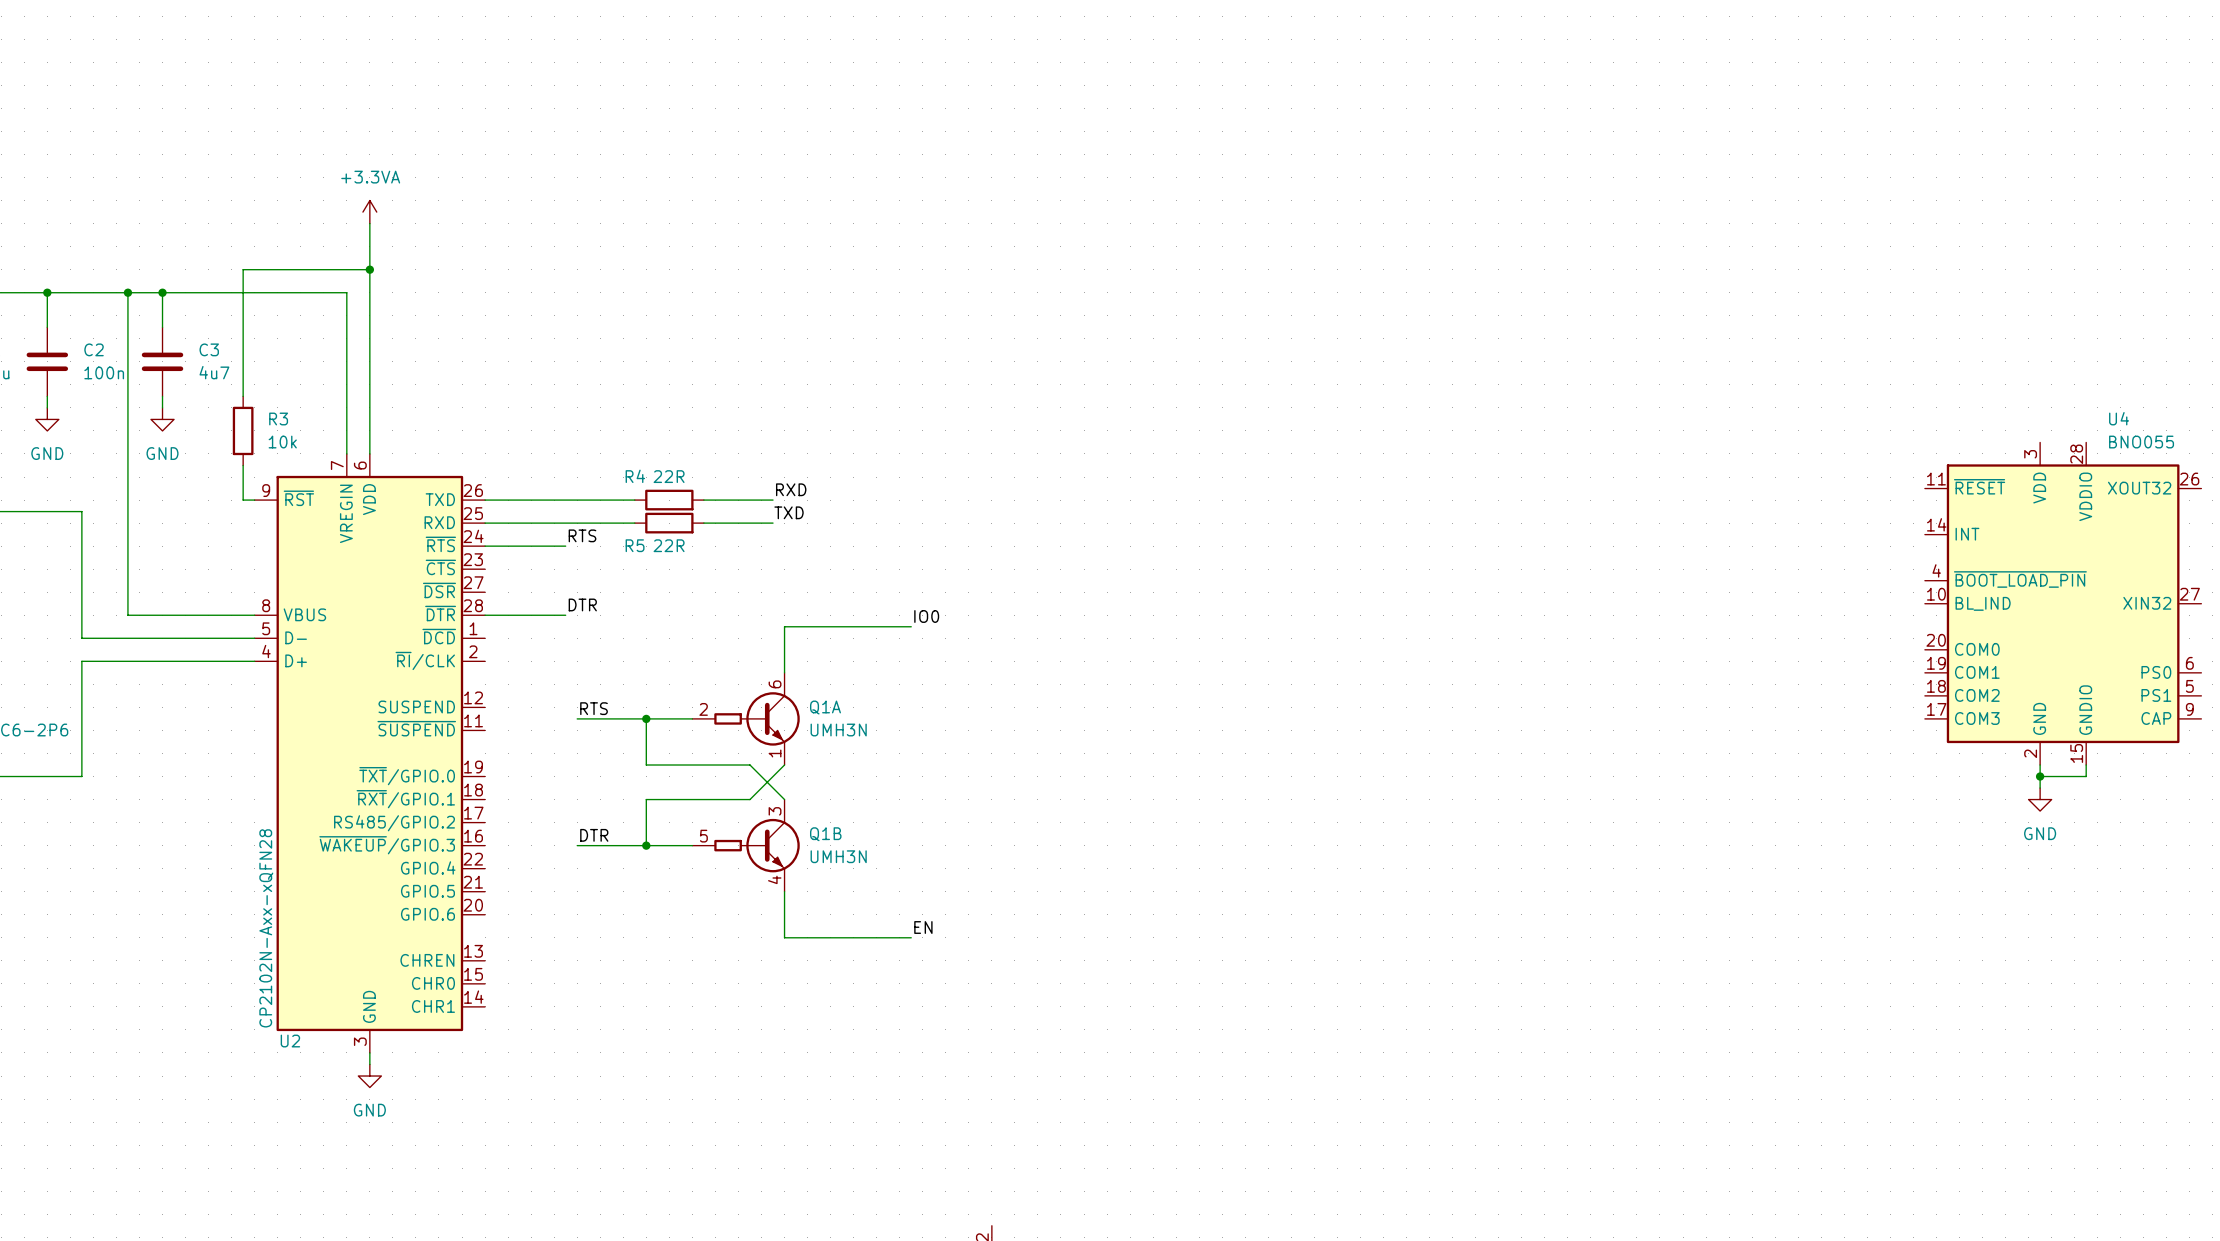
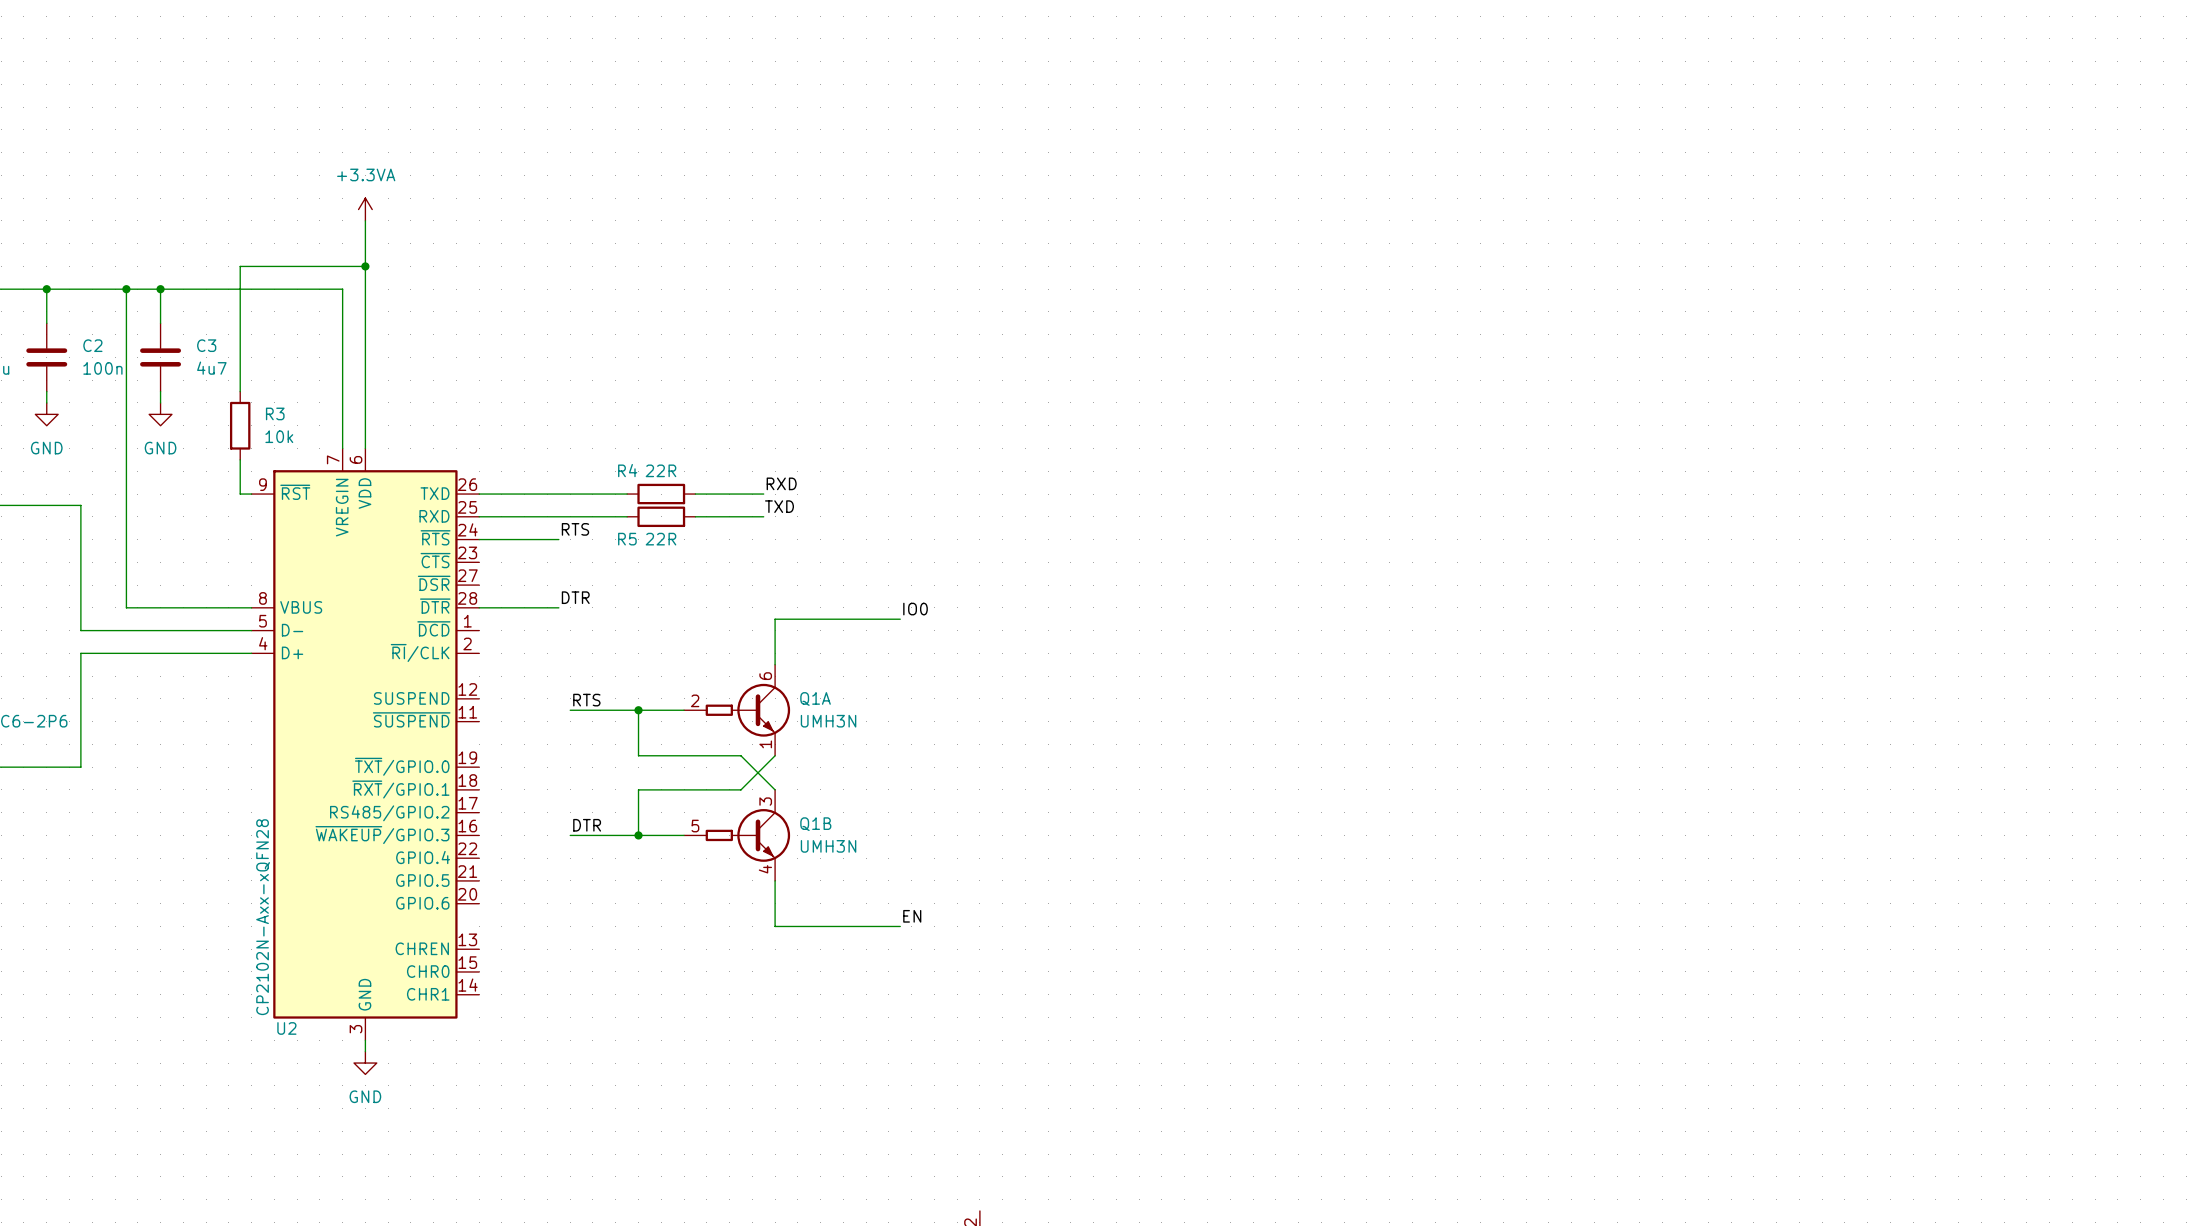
U4: BNO055 (2063, 603) -> none
wire: (2040, 765) (2040, 788) -> none
wire: (2086, 765) (2086, 776) (2040, 776) -> none
junction: (2040, 776) -> none
power symbol: GND (2040, 799) -> none

